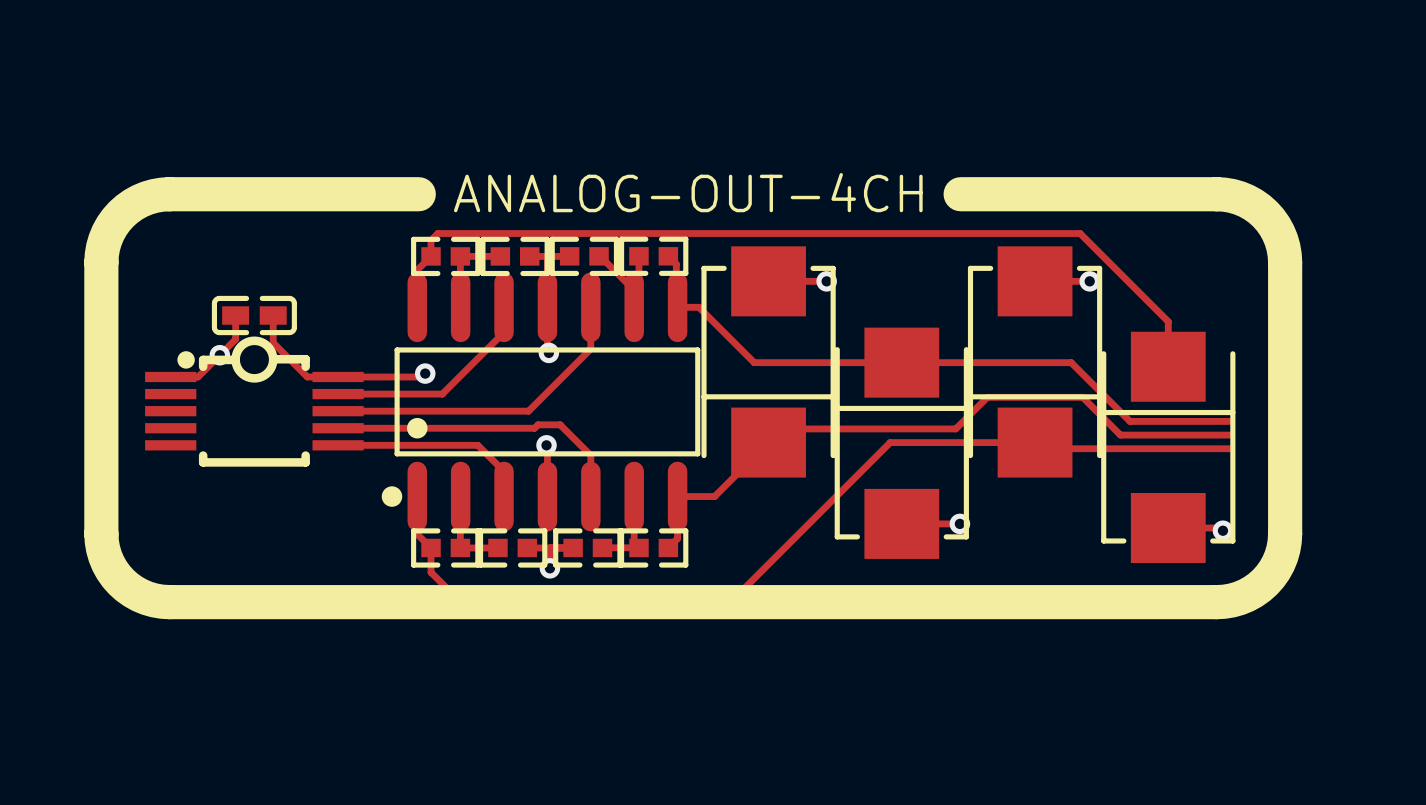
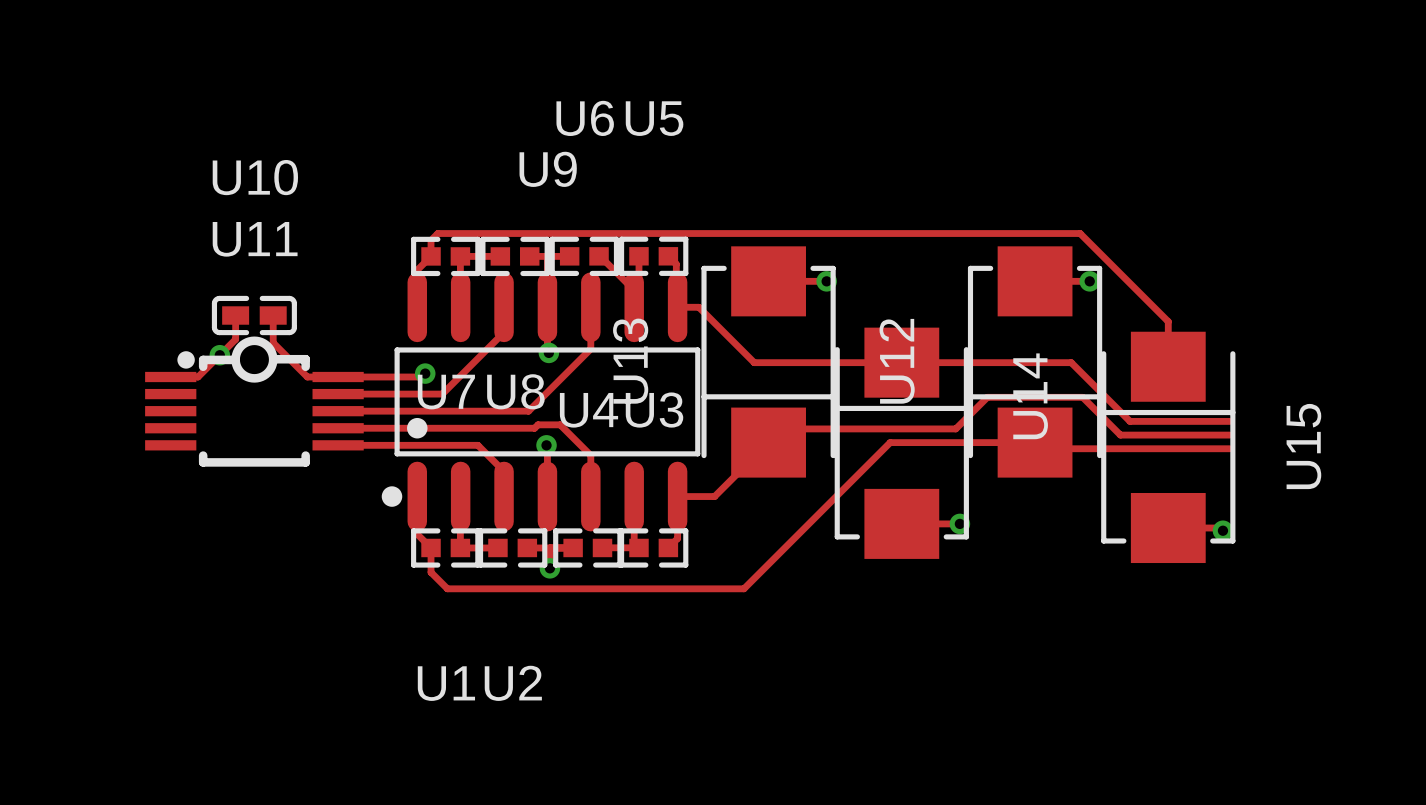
U6 name: none -> U6 (585, 118)
U5 name: none -> U5 (654, 118)
U9 name: none -> U9 (548, 169)
U10 name: none -> U10 (255, 177)
text: ANALOG-OUT-4CH (688, 192) -> none
line: (418, 194) (162, 194) (140, 200) (127, 209) (116, 219) (105, 239) (101, 262) (101, 533) (103, 549) (108, 563) (116, 576) (127, 587) (147, 598) (169, 602) (1216, 602) (1239, 598) (1259, 587) (1270, 576) (1278, 563) (1283, 549) (1285, 533) (1285, 262) (1281, 239) (1270, 219) (1253, 204) (1239, 198) (1224, 194) (960, 194) -> none
U11 name: none -> U11 (255, 239)
U13 name: none -> U13 (630, 361)
U12 name: none -> U12 (897, 361)
U7 name: none -> U7 (446, 392)
U8 name: none -> U8 (515, 391)
U14 name: none -> U14 (1030, 396)
U4 name: none -> U4 (588, 410)
U3 name: none -> U3 (654, 410)
U15 name: none -> U15 (1303, 446)
U1 name: none -> U1 (446, 683)
U2 name: none -> U2 (513, 683)

